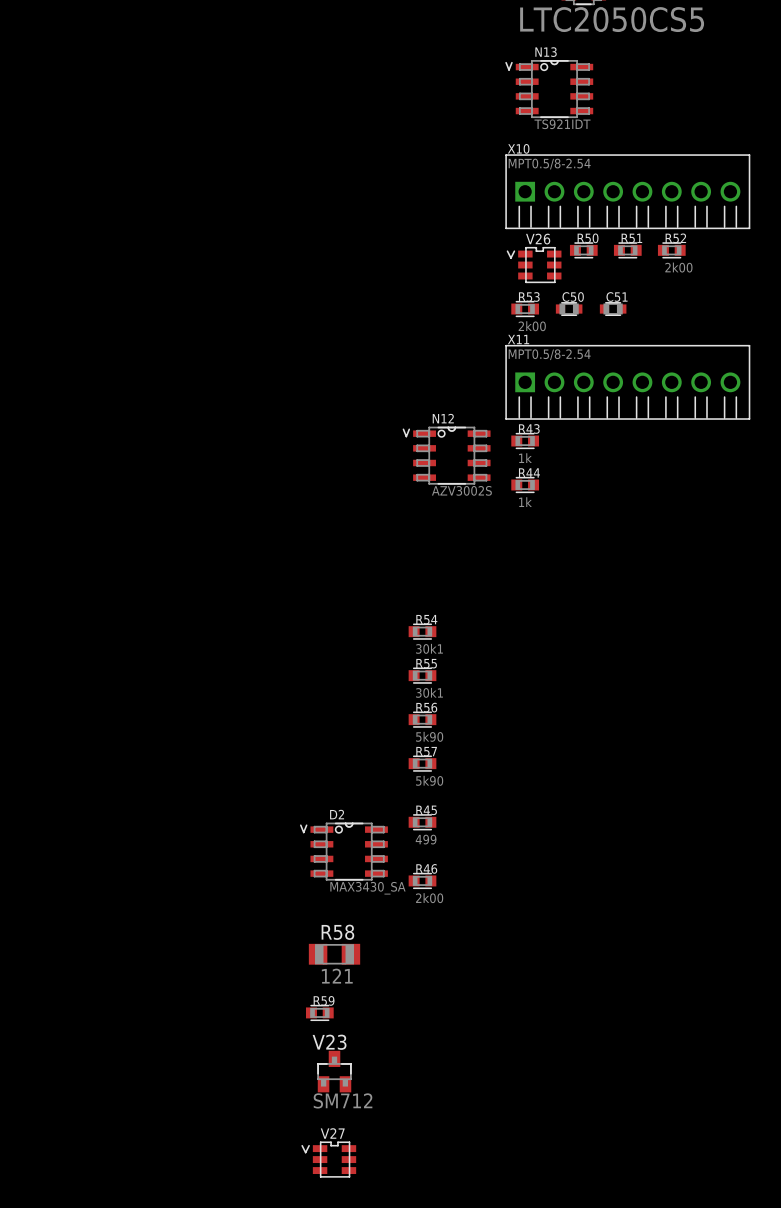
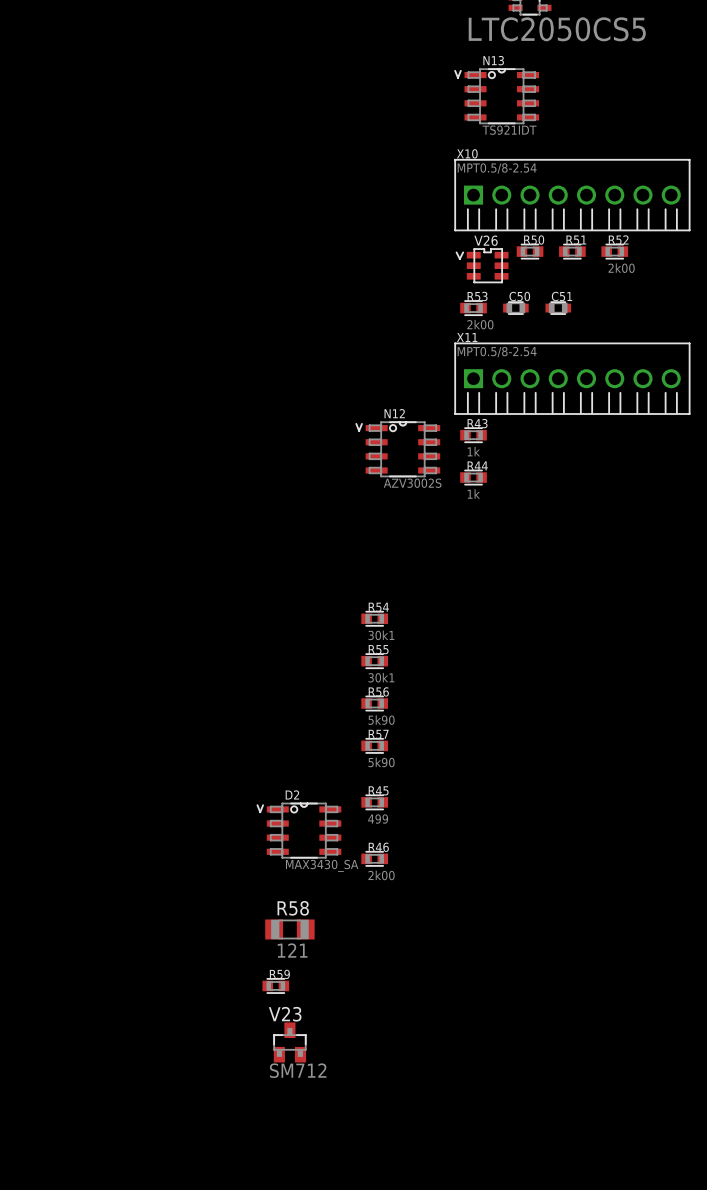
V27: (328, 1159) -> none

